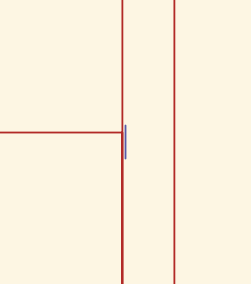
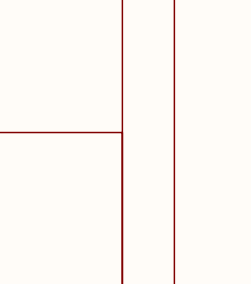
bus: (125, 125) (125, 158) -> none

